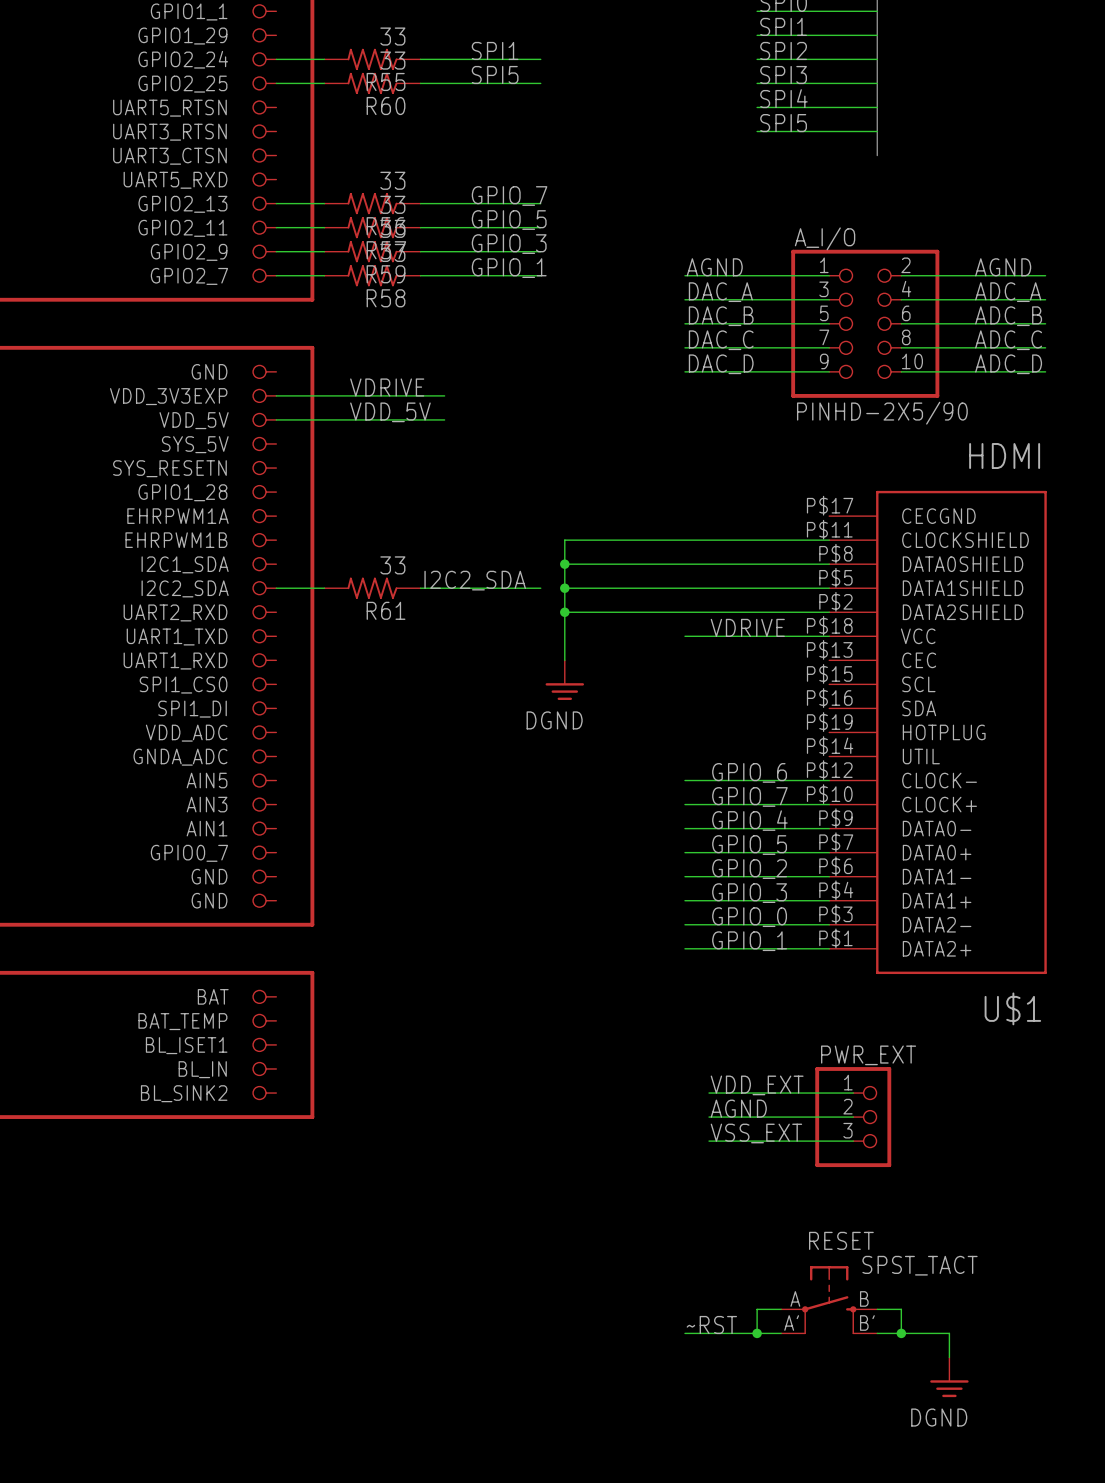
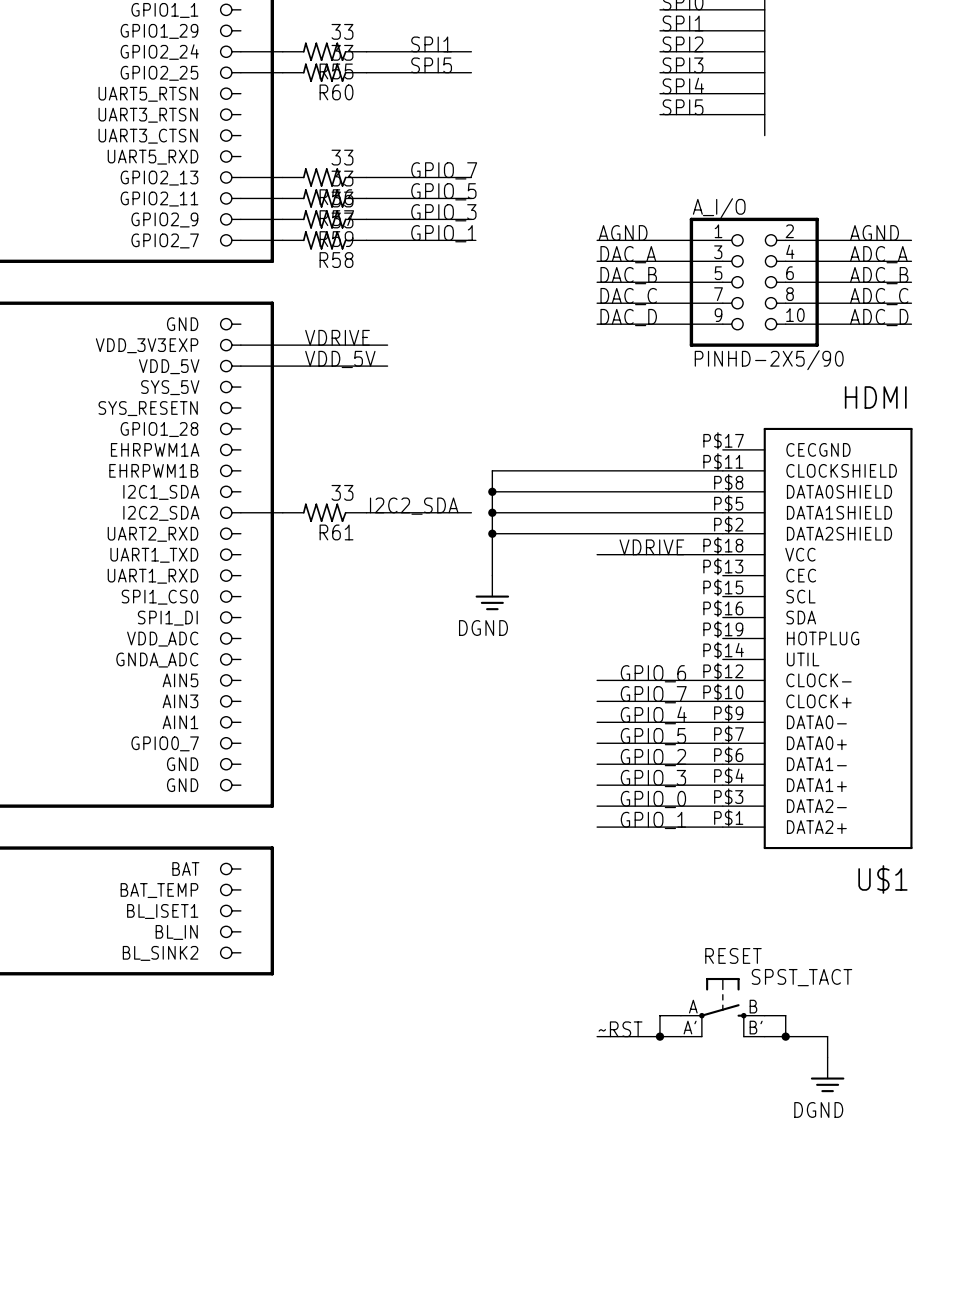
label: VDD_EXT (757, 1085) -> none
wire: (709, 1093) (853, 1093) -> none
label: AGND (738, 1108) -> none
wire: (709, 1117) (853, 1117) -> none
PWR_EXT: (853, 1117) -> none
label: VSS_EXT (756, 1133) -> none
wire: (709, 1141) (853, 1141) -> none
junction: none -> (659, 1036)
junction: none -> (785, 1036)
RESET position: (829, 1300) -> (722, 1007)
wire: (781, 1309) (757, 1309) (757, 1333) -> (680, 1015) (659, 1015) (659, 1036)
wire: (877, 1309) (901, 1309) (901, 1333) -> (764, 1015) (785, 1015) (785, 1036)
label position: ~RST (711, 1324) -> ~RST (620, 1029)
wire: (684, 1333) (781, 1333) -> (597, 1036) (680, 1036)
junction: (757, 1333) -> none
wire: (877, 1333) (949, 1333) (949, 1357) -> (764, 1036) (827, 1036) (827, 1057)
junction: (901, 1333) -> none
power symbol position: DGND (949, 1377) -> DGND (827, 1074)

